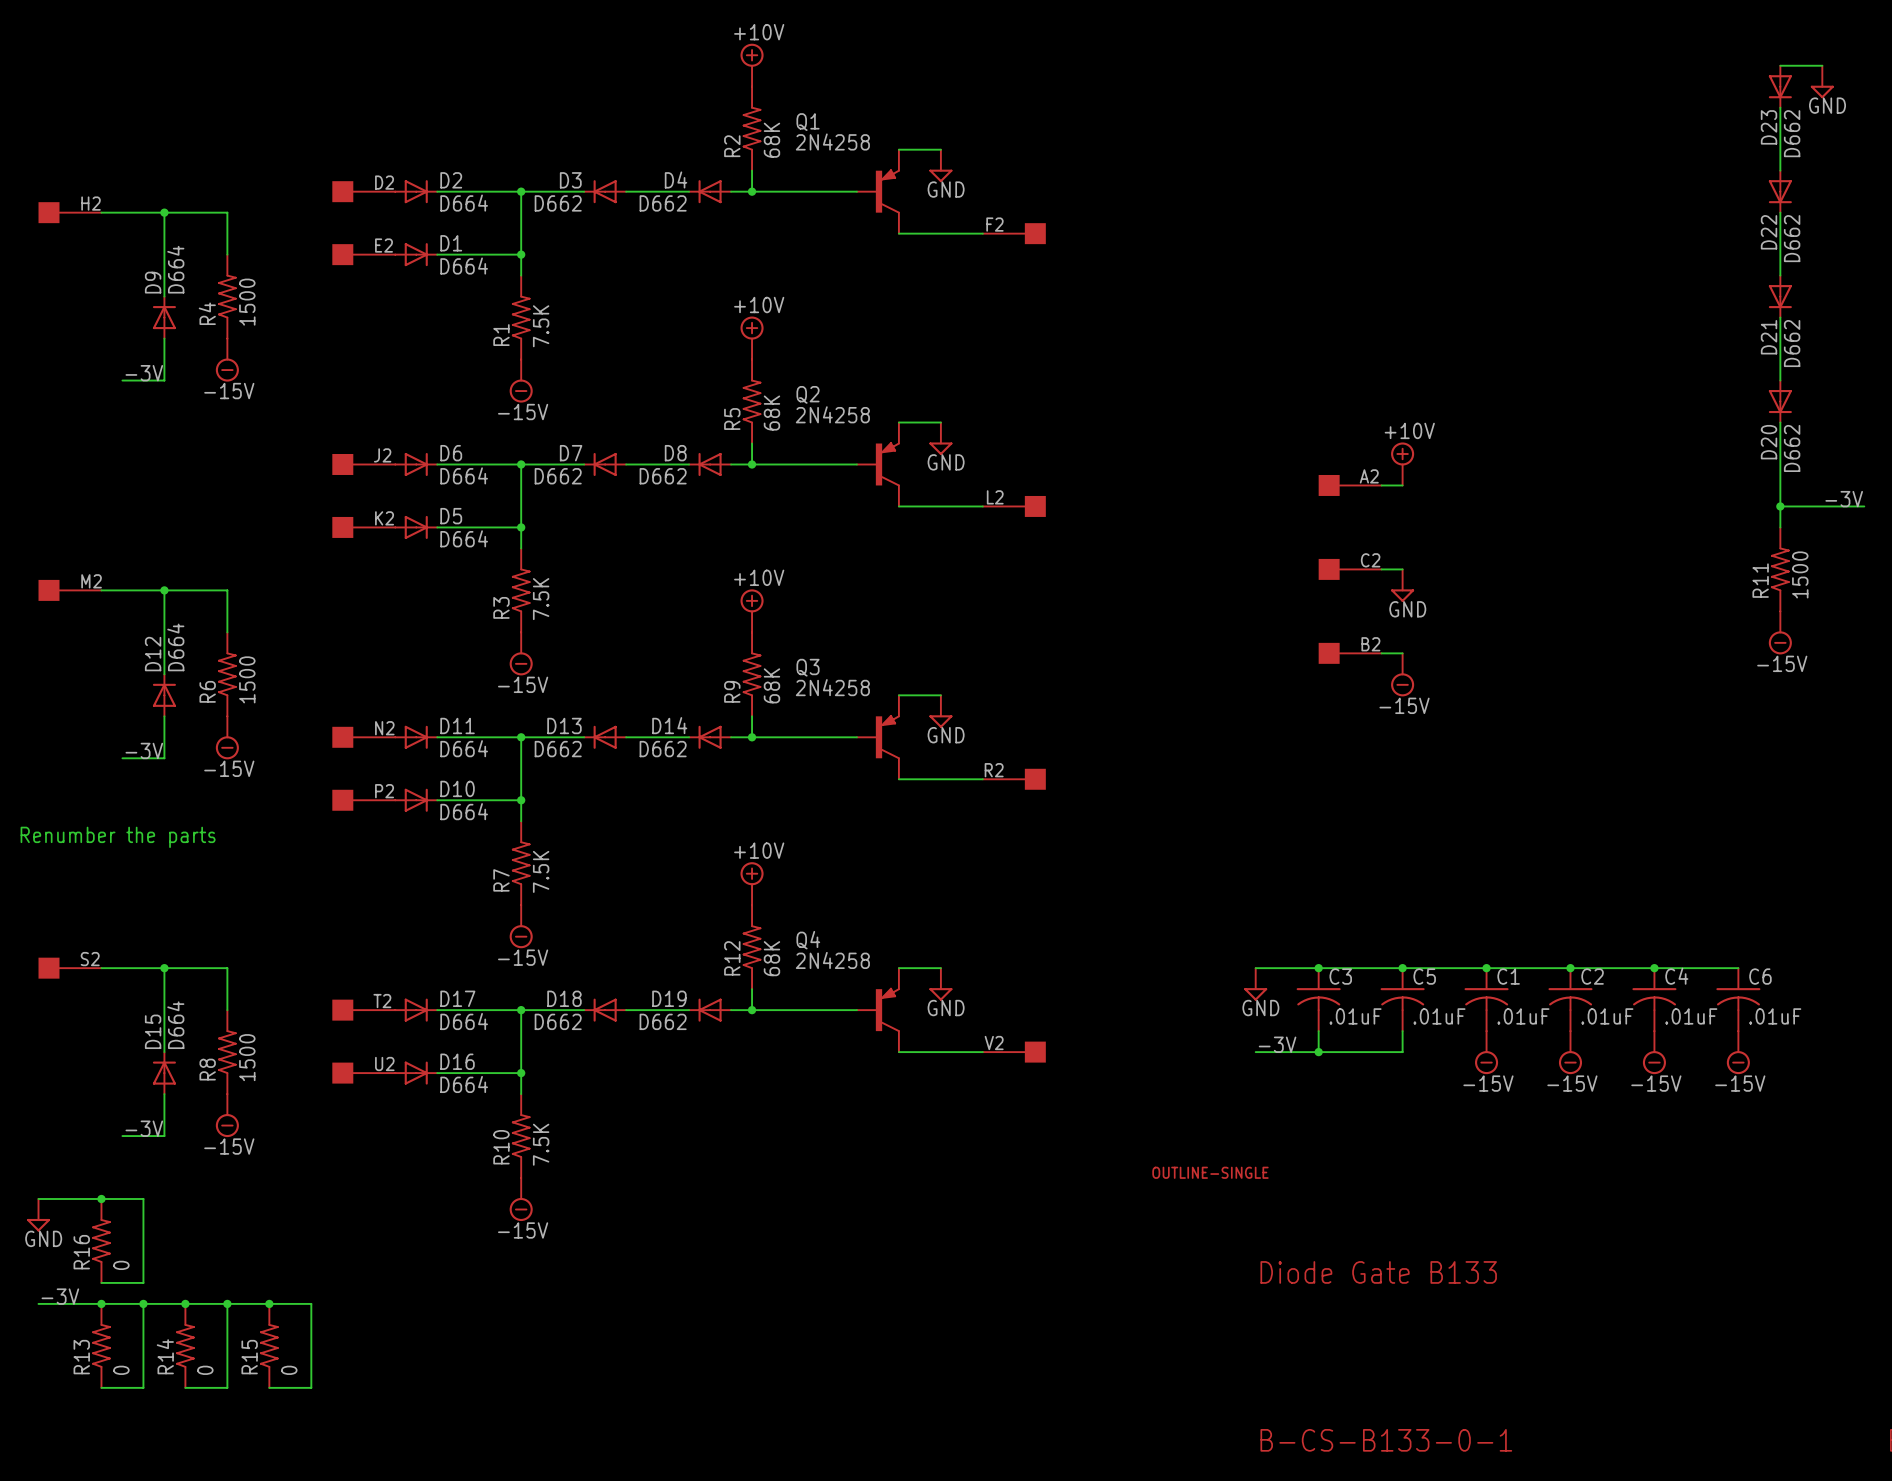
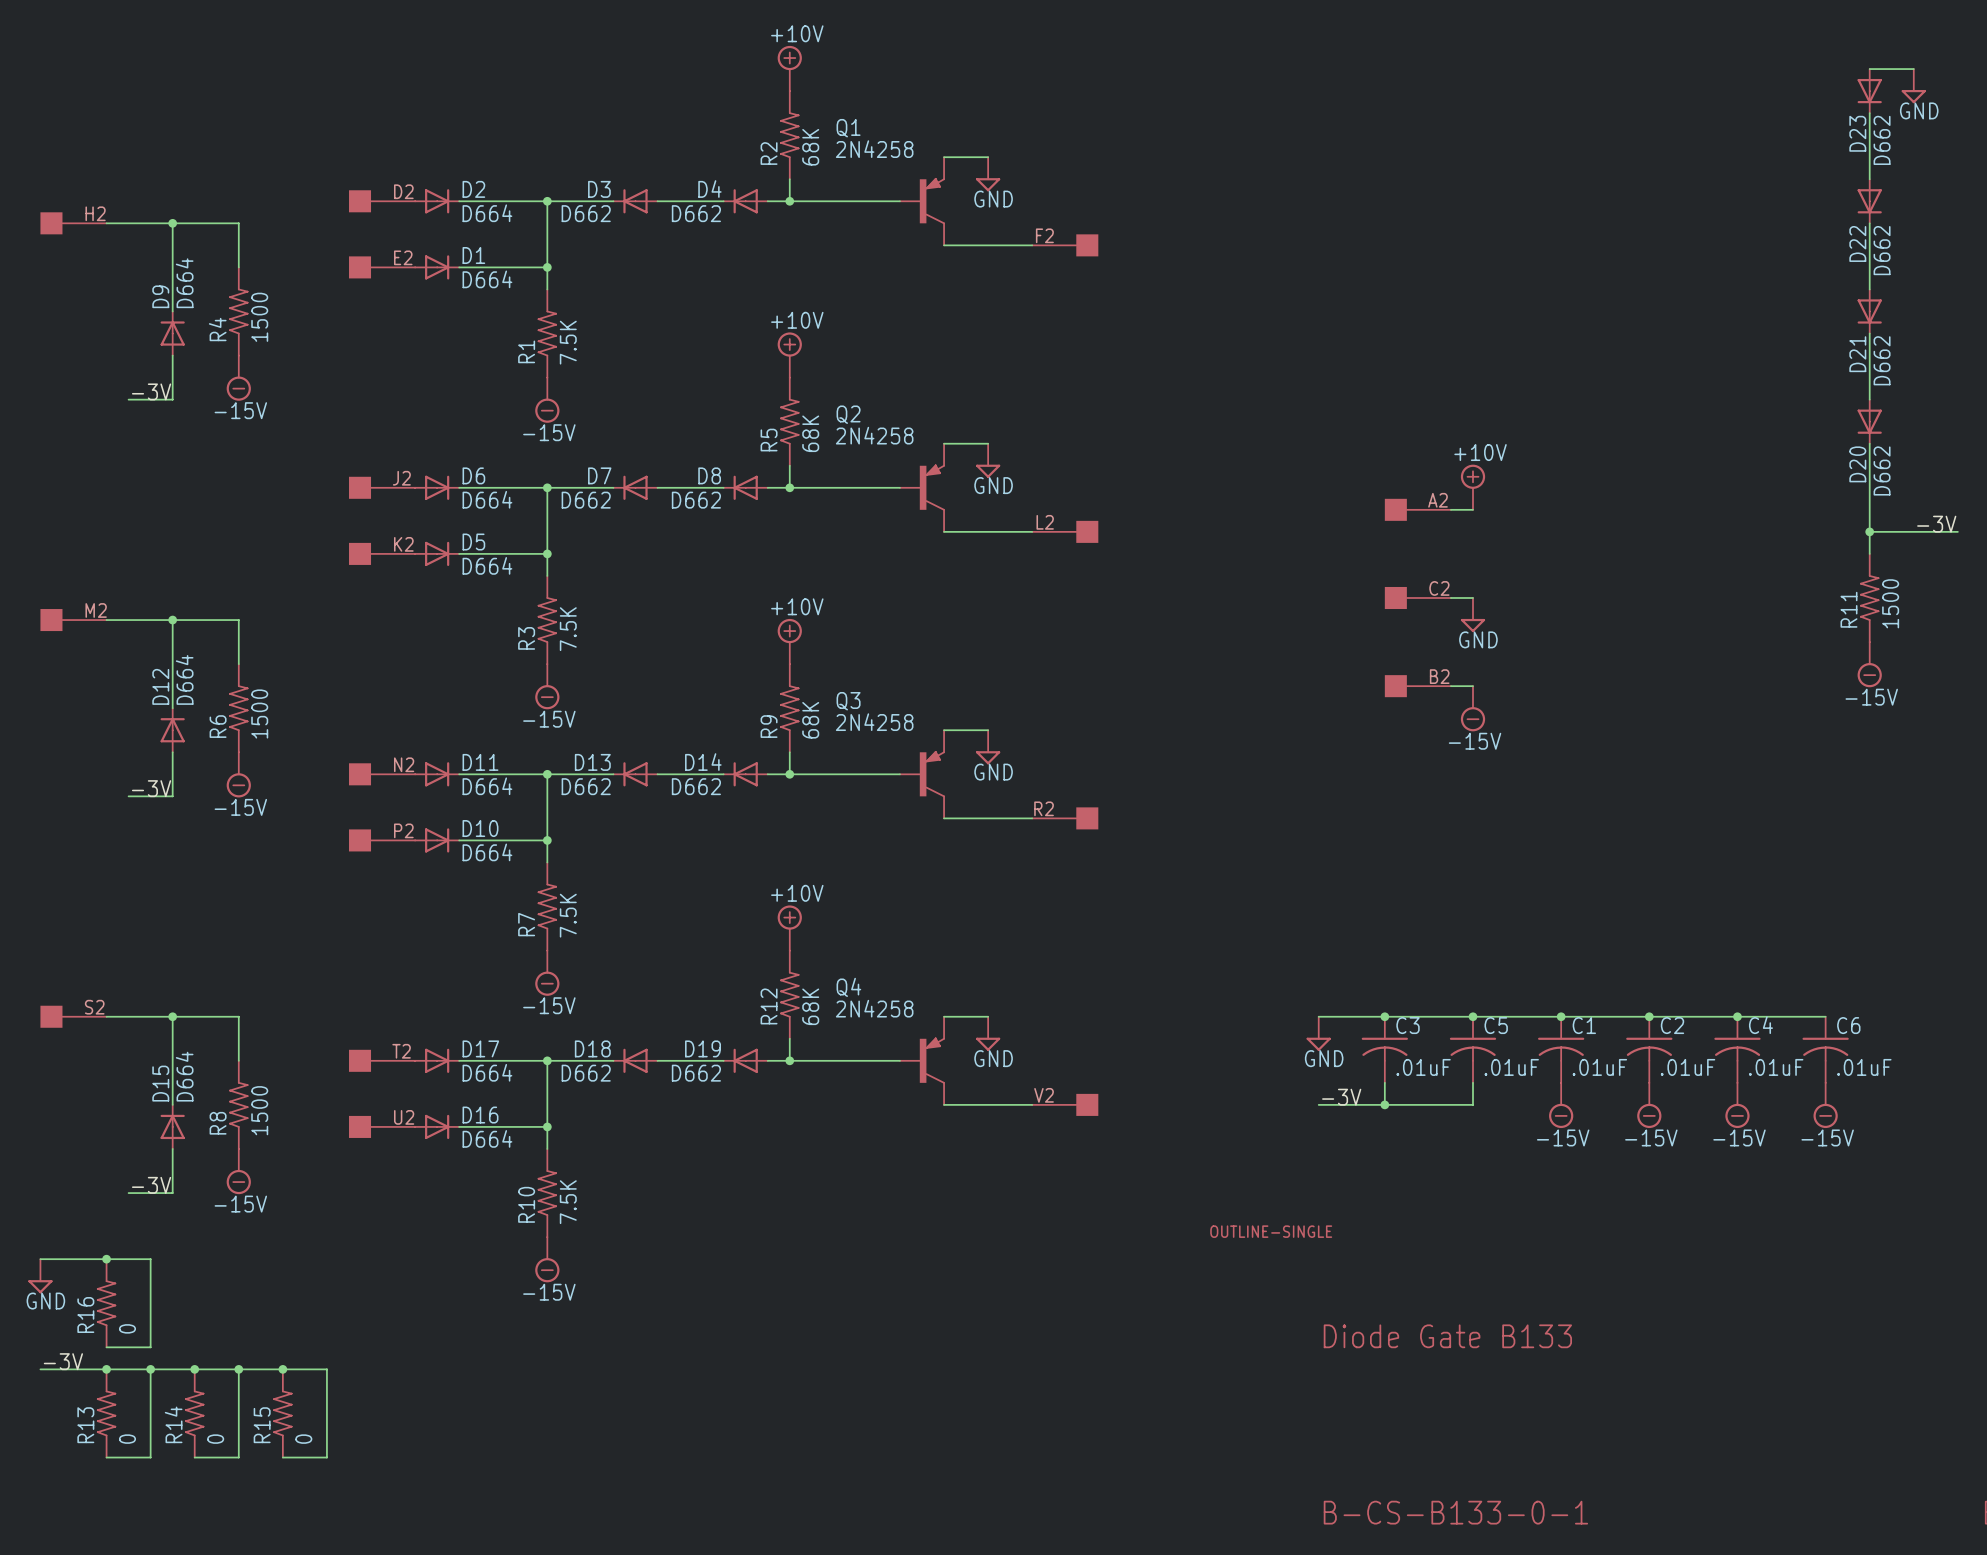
text: Renumber the parts (118, 837) -> none

